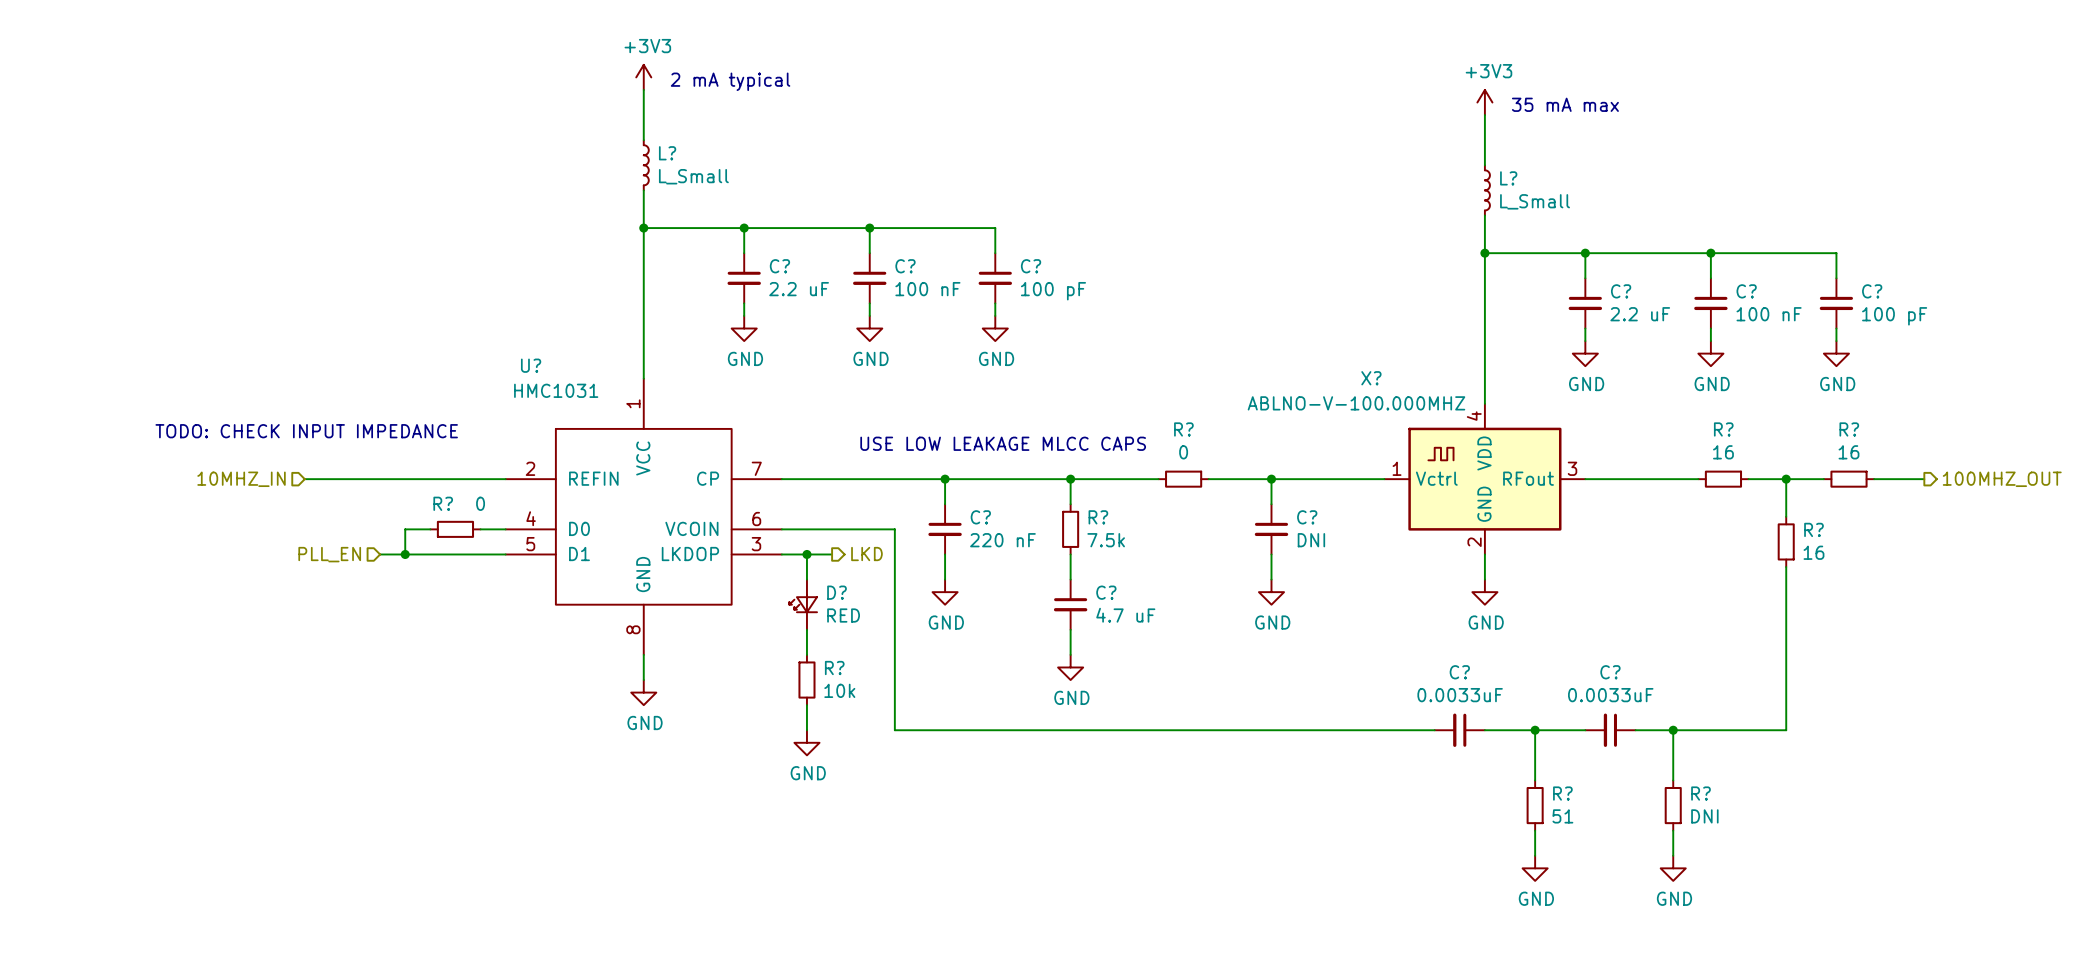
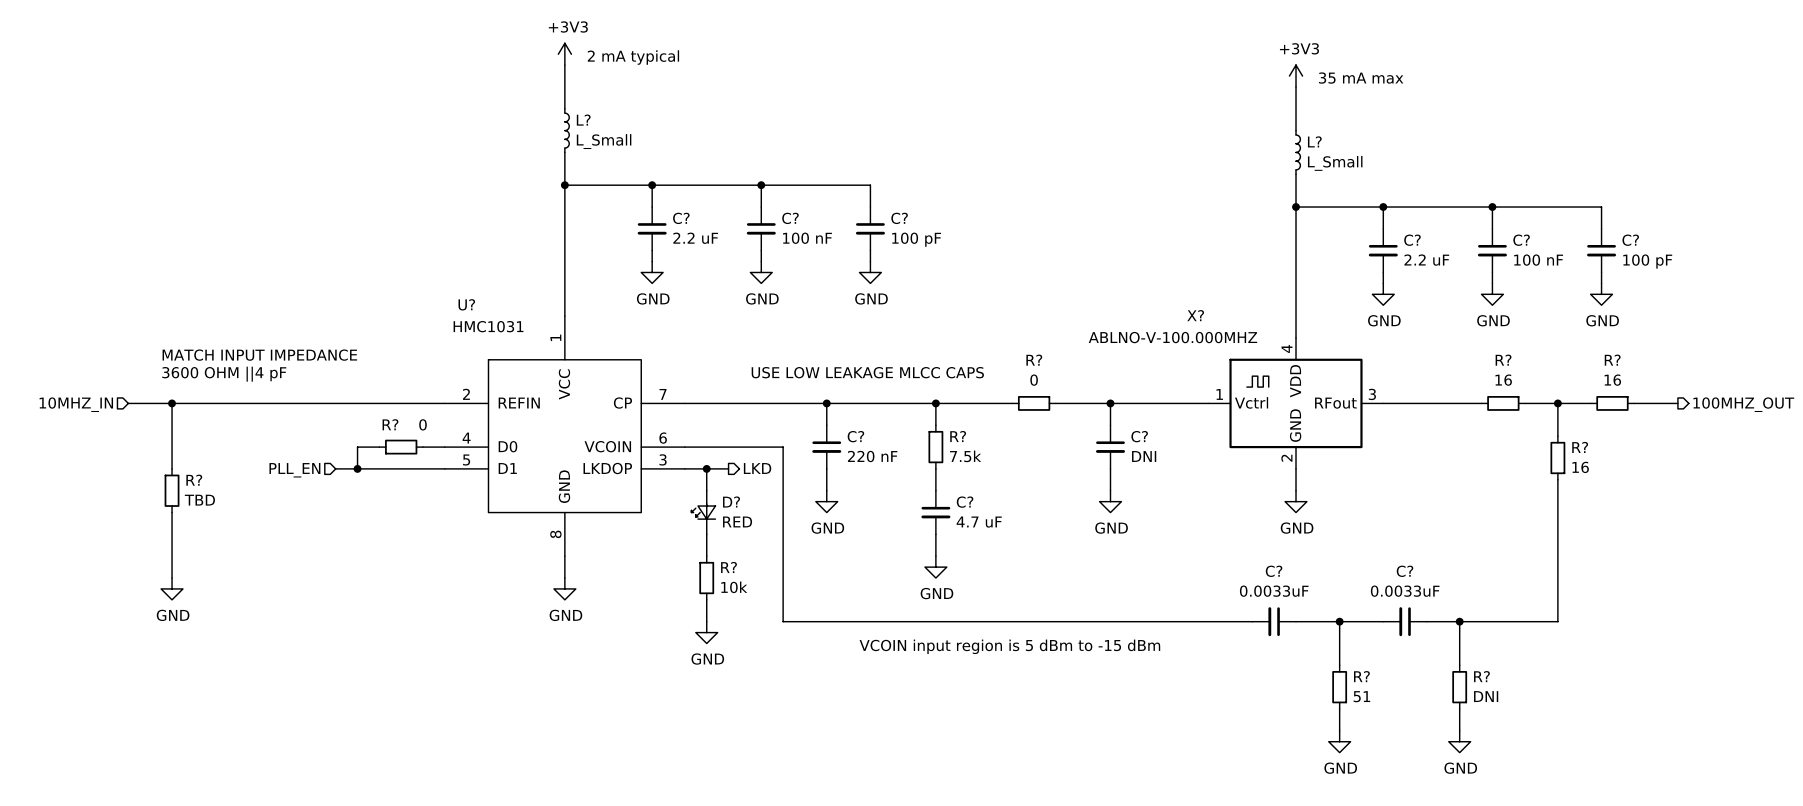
text: TODO: CHECK INPUT IMPEDANCE (306, 431) -> MATCH INPUT IMPEDANCE (259, 355)
text: none -> 3600 OHM ||4 pF (224, 374)
wire: none -> (128, 403) (270, 403)
wire: none -> (172, 403) (172, 468)
junction: none -> (172, 403)
hierarchical label position: 10MHZ_IN (241, 479) -> 10MHZ_IN (76, 404)
R?: none -> TBD (172, 490)
wire: none -> (172, 512) (172, 578)
power symbol: none -> GND (172, 588)
text: none -> VCOIN input region is 5 dBm to -15 dBm (1009, 646)

